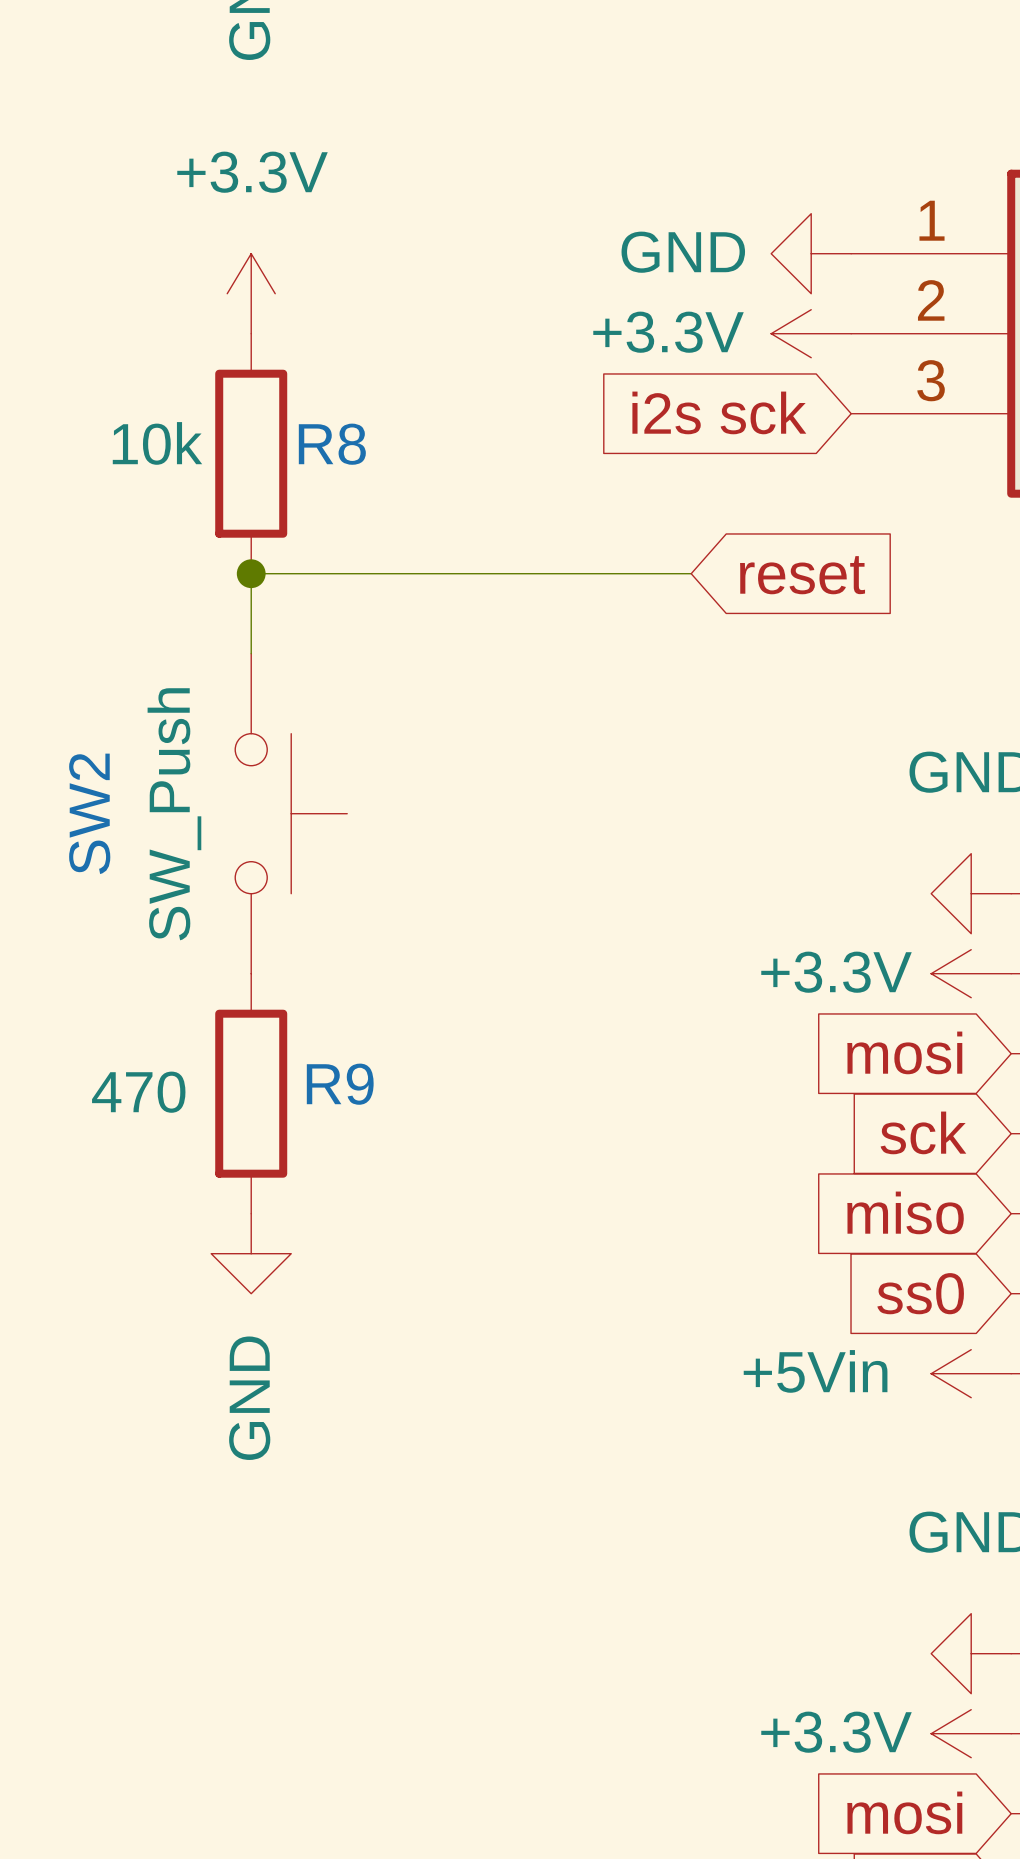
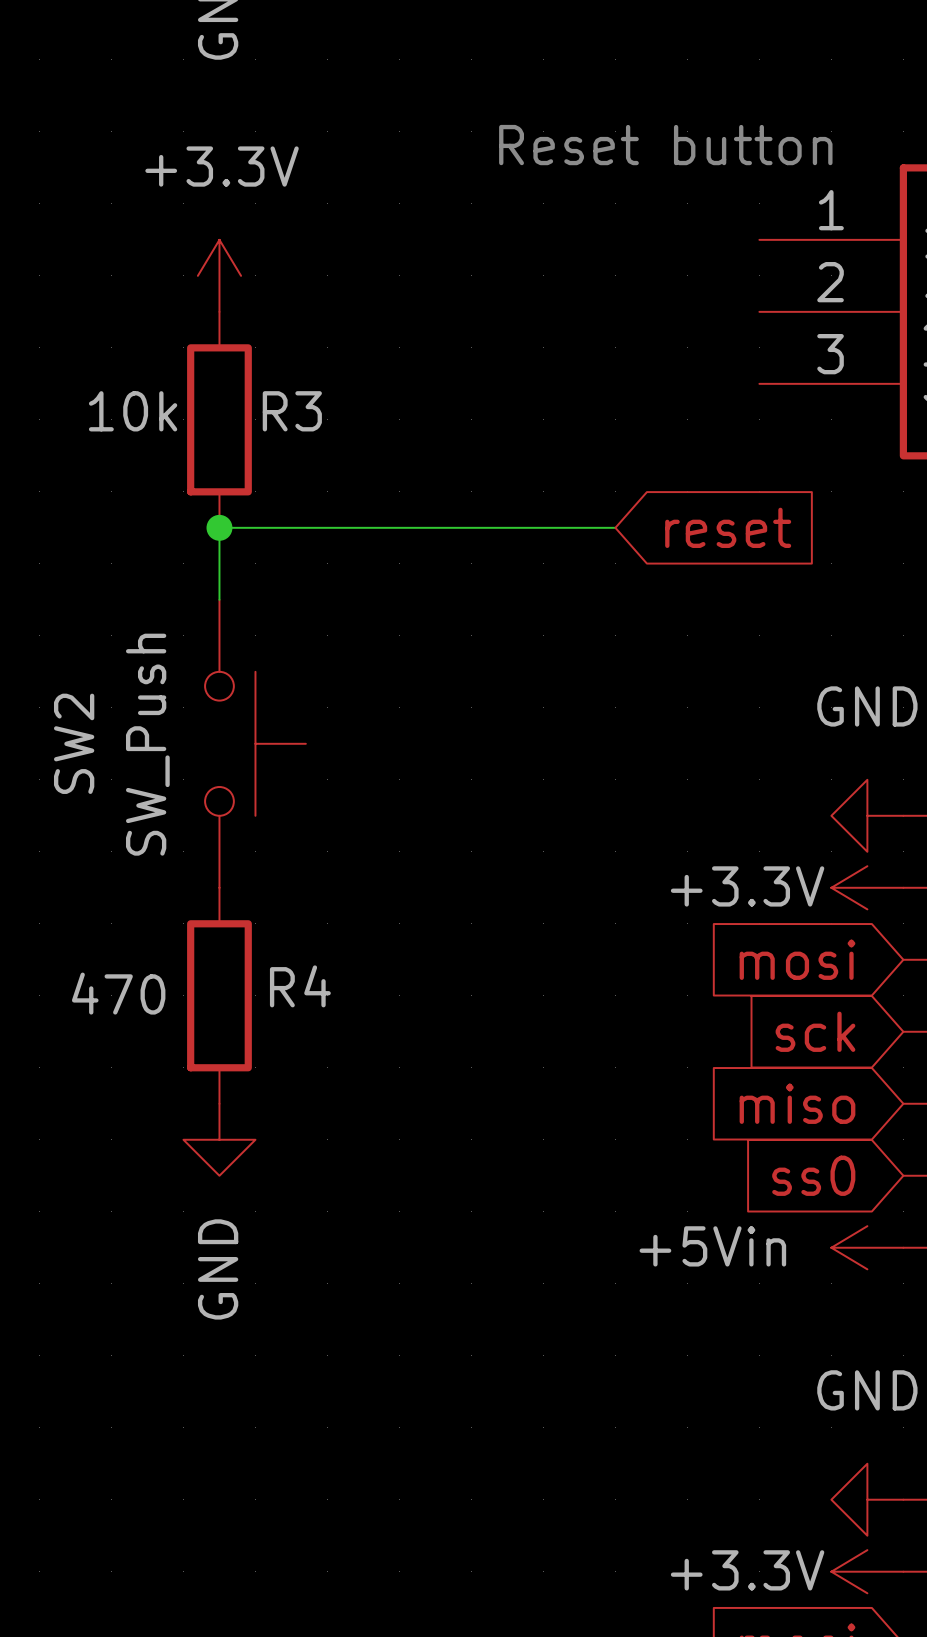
text: none -> Reset button (665, 145)
power symbol: GND (811, 253) -> none
power symbol: +3.3V (811, 333) -> none
global label: i2s sck (719, 412) -> none
R8 name: R8 (332, 444) -> R3 (292, 411)
R9 name: R9 (340, 1084) -> R4 (300, 986)

